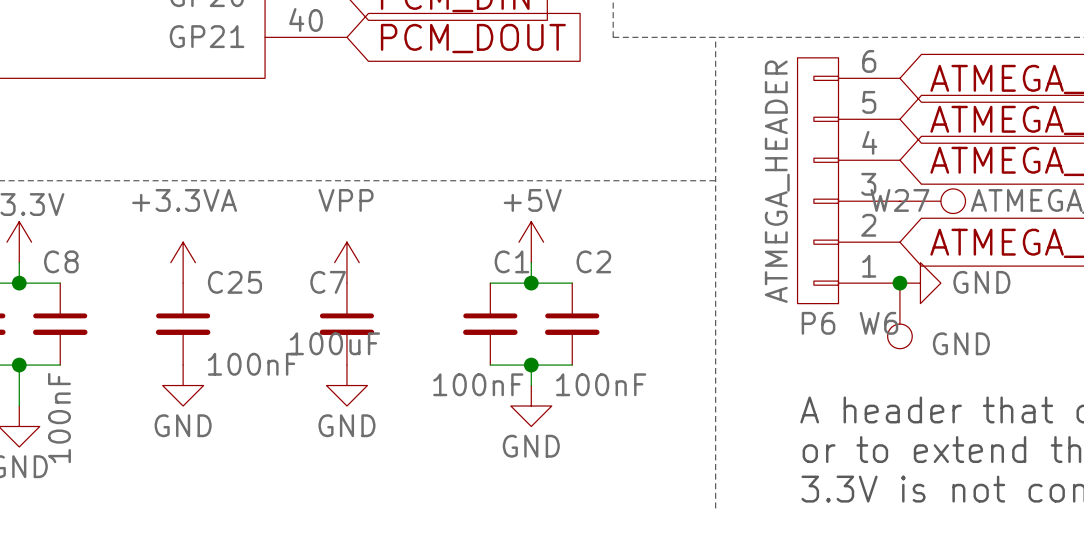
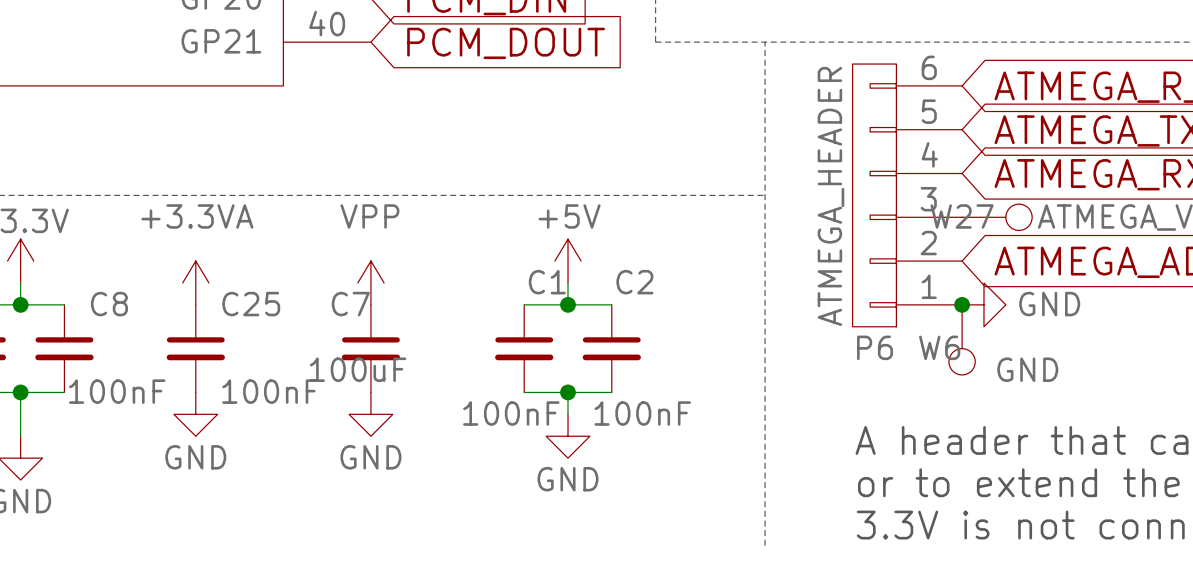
C8 name position: C8 (61, 261) -> C8 (109, 304)
C8 value rotation: 0° (59, 418) -> 90° clockwise (117, 391)

